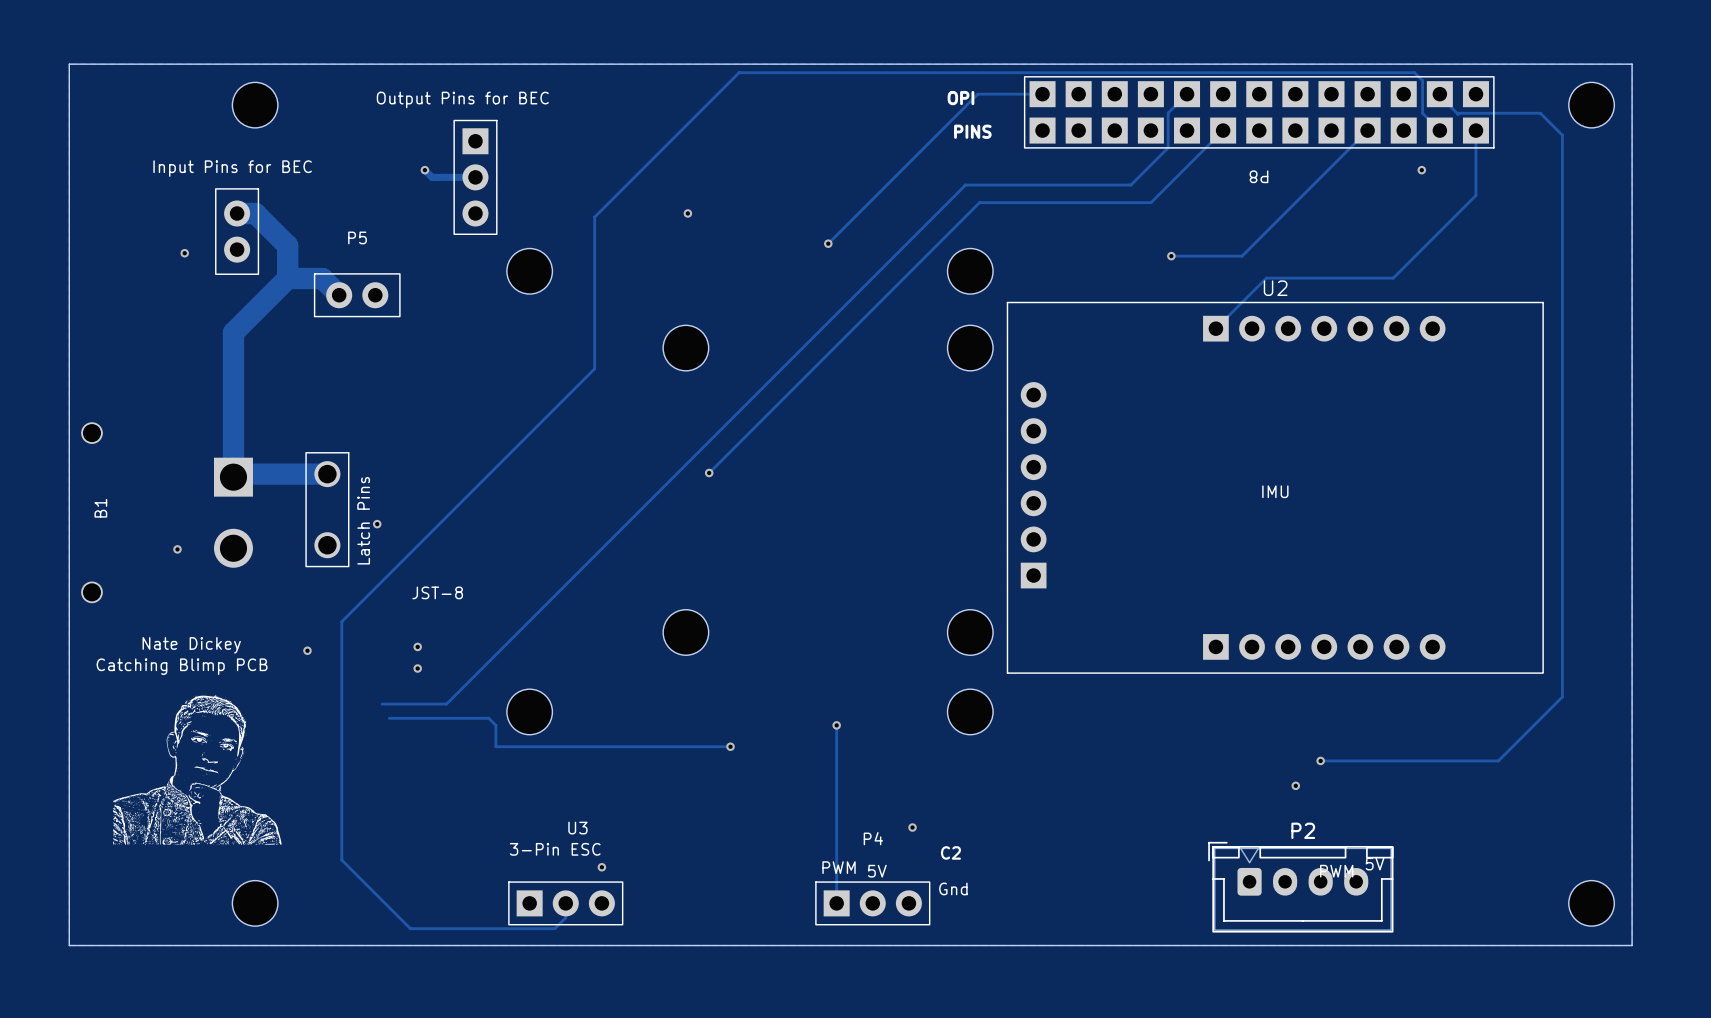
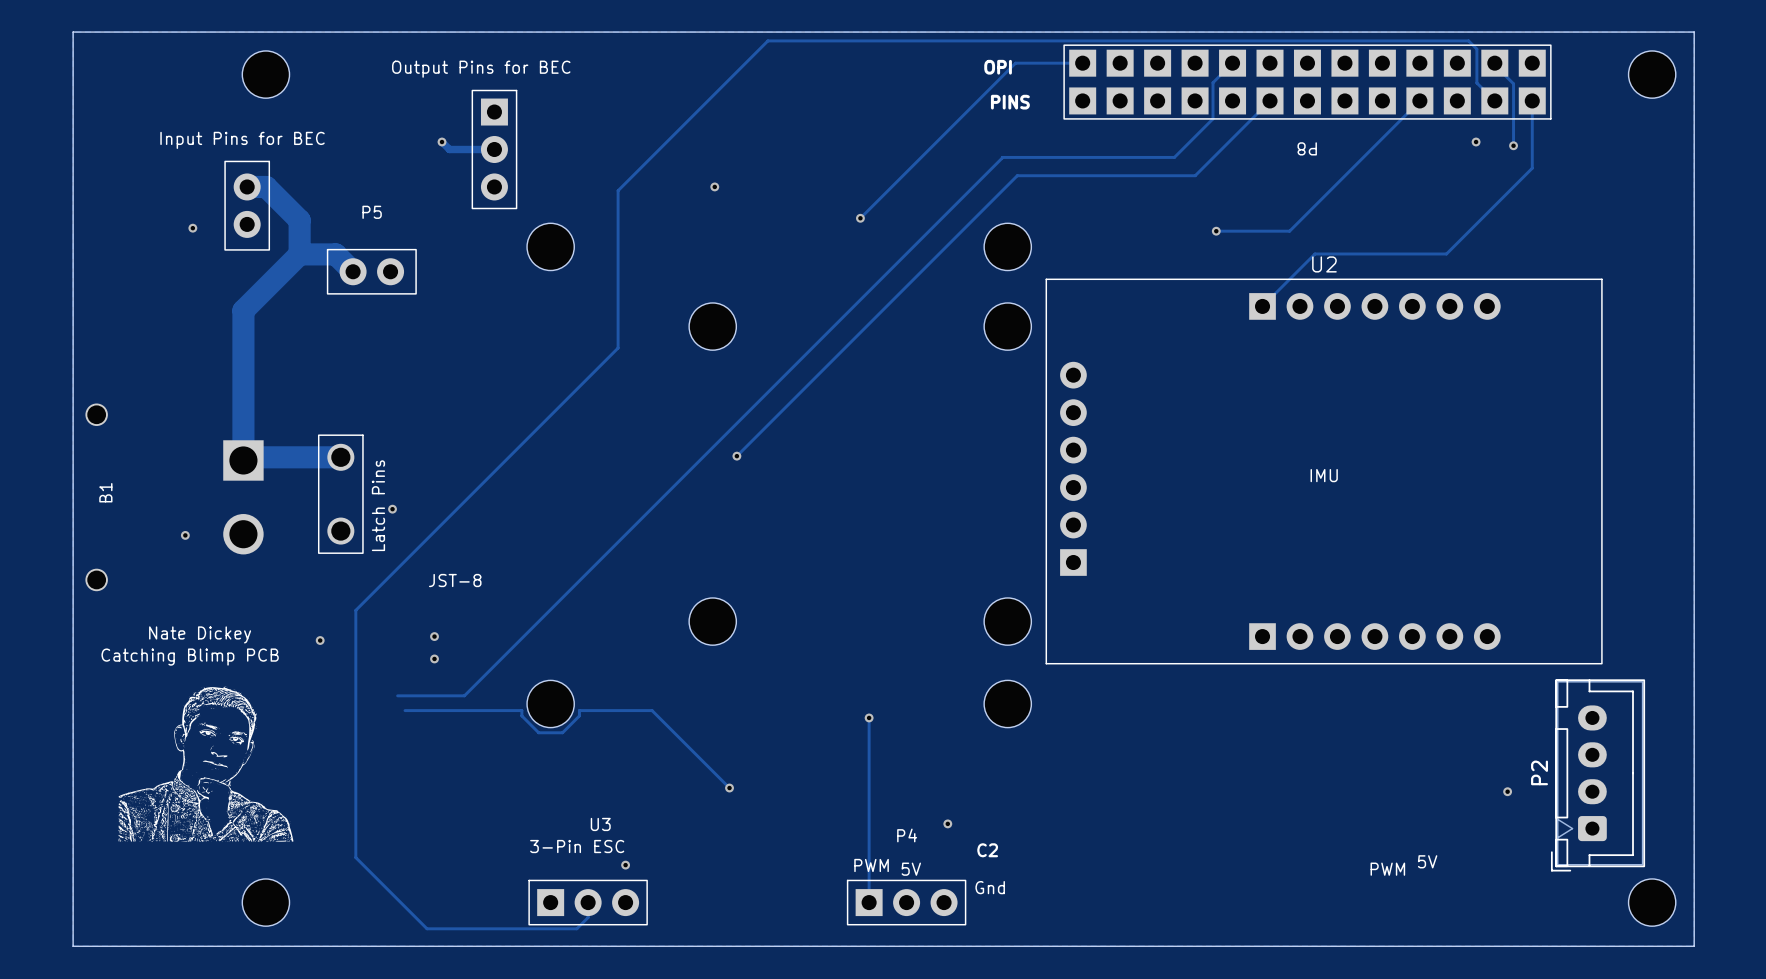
track: (1457, 114) (1540, 113) (1562, 135) (1562, 696) (1498, 760) (1320, 760) -> (1513, 83) (1513, 145)
via: none -> (1513, 145)
track: (488, 718) (495, 725) (495, 746) (730, 746) -> (508, 710) (521, 710) (521, 715) (538, 732) (562, 732) (579, 715) (579, 710) (652, 710) (729, 788)
via position: (730, 746) -> (729, 788)
via: (1320, 760) -> none
via: (1295, 785) -> none
via: none -> (1507, 791)
P2 rotation: 0° (1300, 887) -> 90° counterclockwise (1598, 775)
P2 position: (1300, 887) -> (1598, 775)

